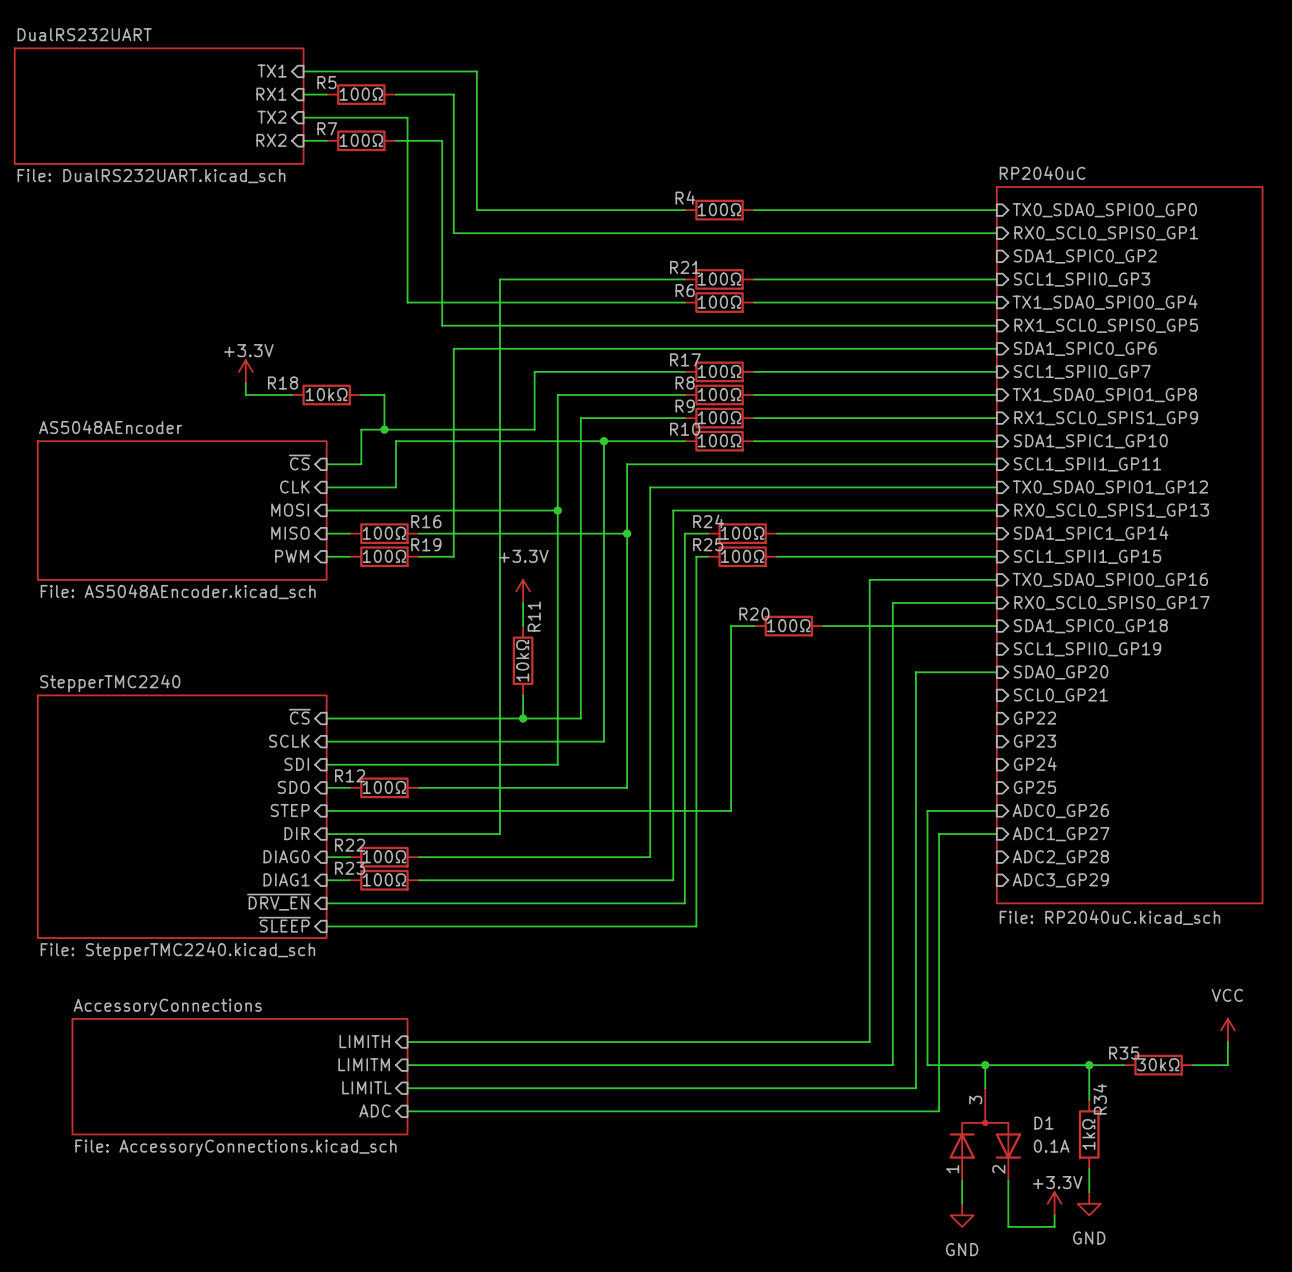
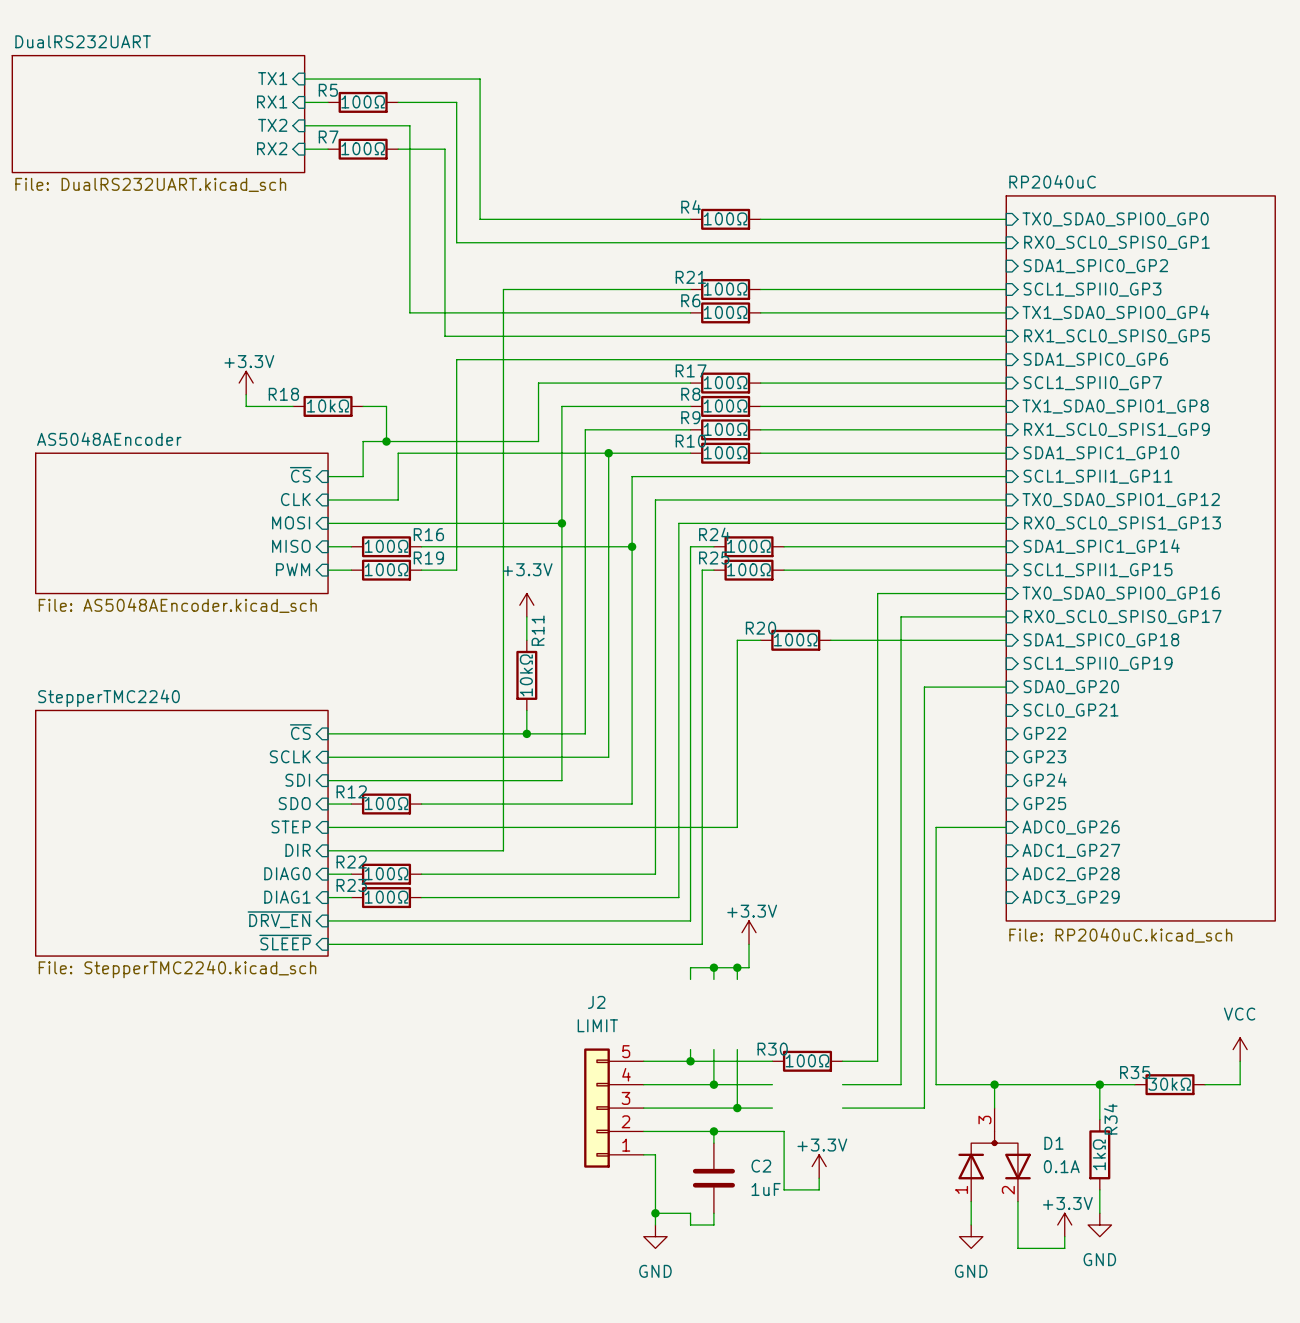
wire: (996, 834) (939, 834) (939, 1111) (777, 1111) -> (819, 1178) (819, 1189) (784, 1189) (784, 1131)
power symbol: none -> +3.3V (749, 932)
wire: none -> (749, 944) (749, 967) (690, 967) (690, 979)
wire: none -> (713, 967) (713, 979)
junction: none -> (713, 967)
wire: none -> (737, 967) (737, 979)
junction: none -> (737, 967)
wire: none -> (690, 1049) (690, 1061)
wire: none -> (713, 1049) (713, 1084)
wire: none -> (737, 1049) (737, 1108)
sheet pin: LIMITH (364, 1041) -> none
wire: (407, 1042) (638, 1042) -> none
junction: none -> (690, 1061)
R30: none -> 100Ω (807, 1061)
sheet pin: LIMITM (364, 1064) -> none
wire: (407, 1065) (638, 1065) -> none
junction: none -> (713, 1084)
wire: (765, 1065) (835, 1065) -> none
sheet AccessoryConnections: File: AccessoryConnections.kicad_sch (240, 1076) -> none
sheet pin: LIMITL (366, 1087) -> none
wire: (407, 1088) (638, 1088) -> none
J2: none -> LIMIT (613, 1108)
junction: none -> (737, 1108)
wire: (765, 1088) (835, 1088) -> none
sheet pin: ADC (374, 1110) -> none
wire: (407, 1111) (638, 1111) -> none
wire: none -> (713, 1131) (713, 1143)
junction: none -> (713, 1131)
wire: none -> (643, 1154) (655, 1154) (655, 1224)
power symbol: none -> +3.3V (819, 1166)
C2: none -> 1uF (713, 1178)
wire: none -> (655, 1213) (690, 1213) (690, 1224) (713, 1224) (713, 1213)
junction: none -> (655, 1213)
power symbol: none -> GND (655, 1236)

